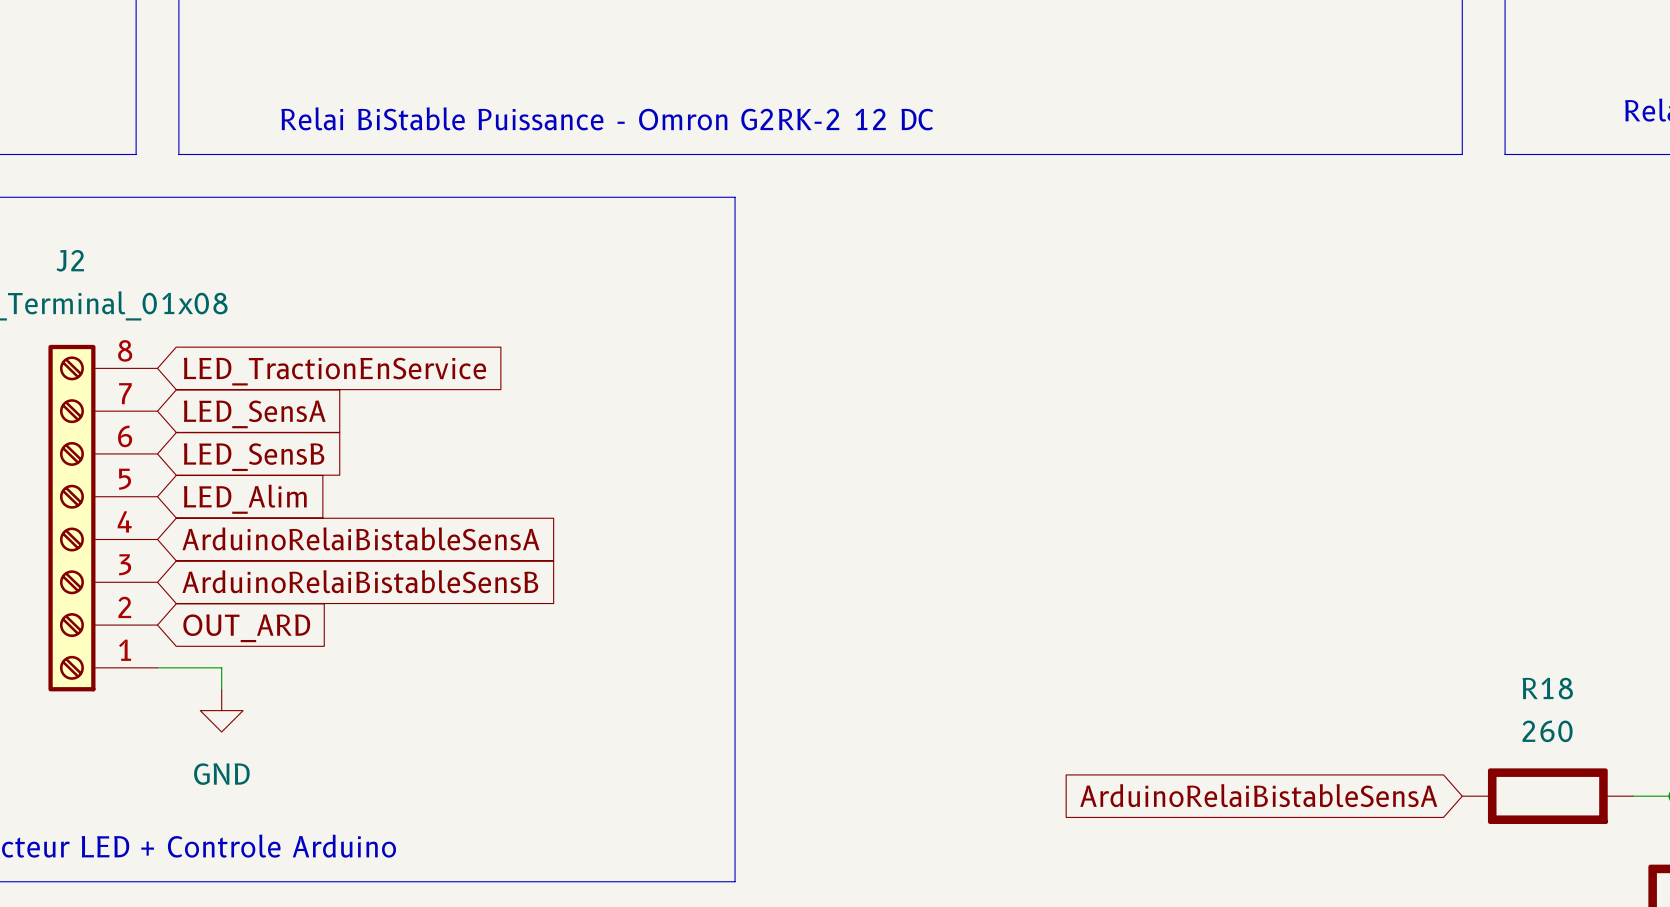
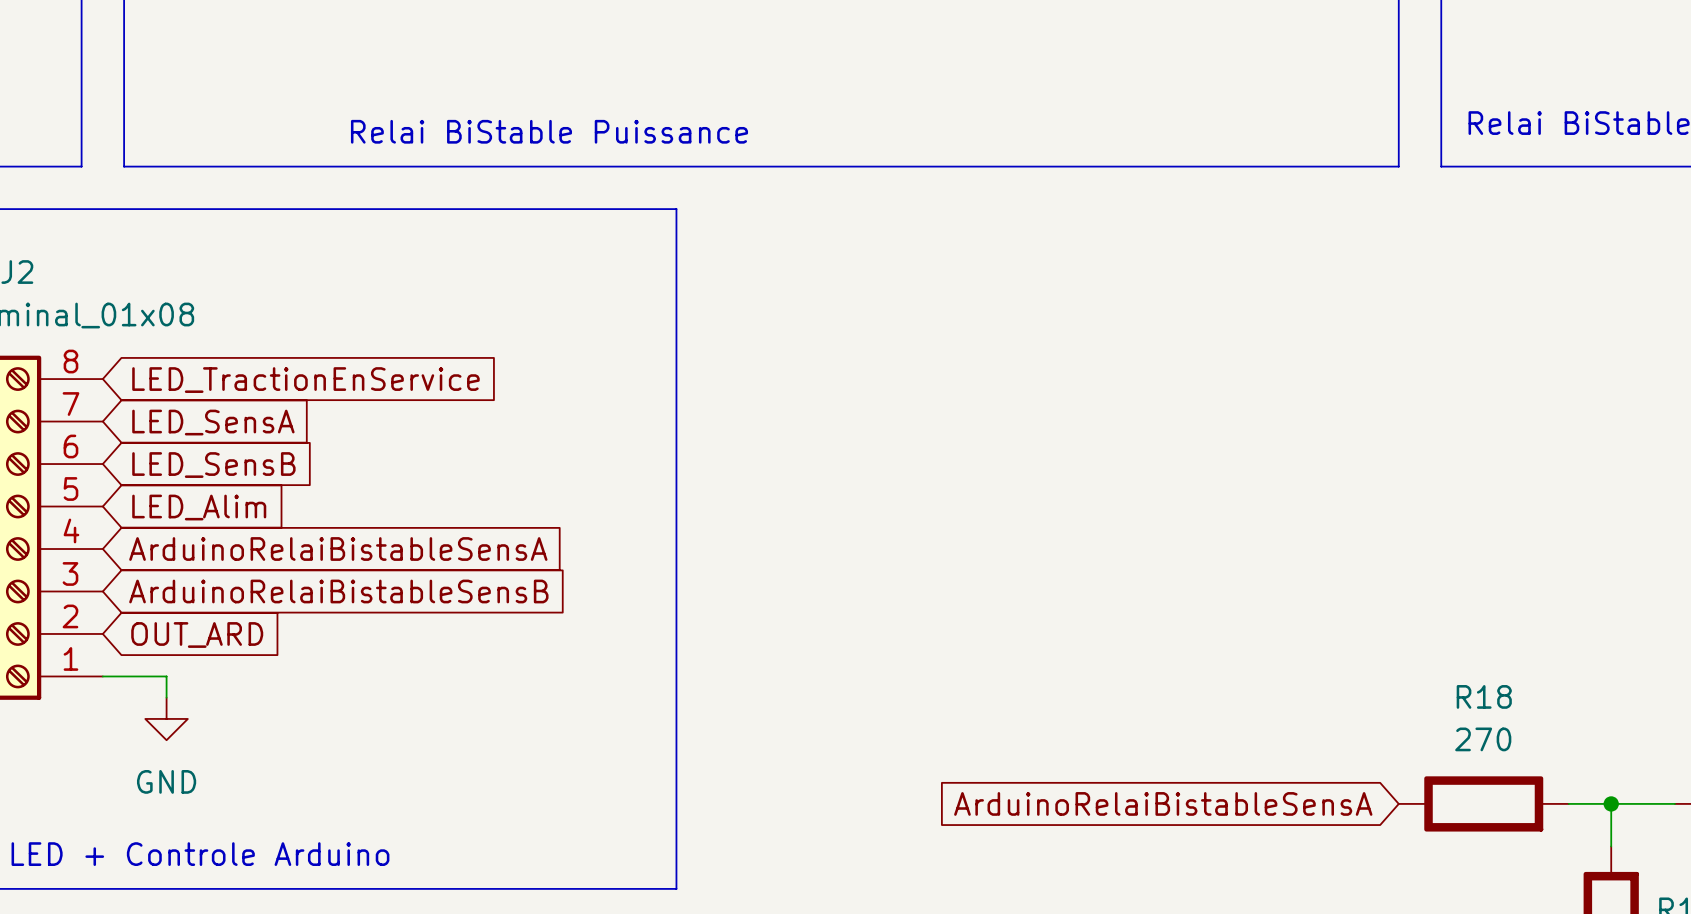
text: Relai BiStable Puissance - Omron G2RK-2 12 DC (607, 118) -> Relai BiStable Puissance (549, 131)
R18 value: 260 (1547, 731) -> 270 (1483, 739)

